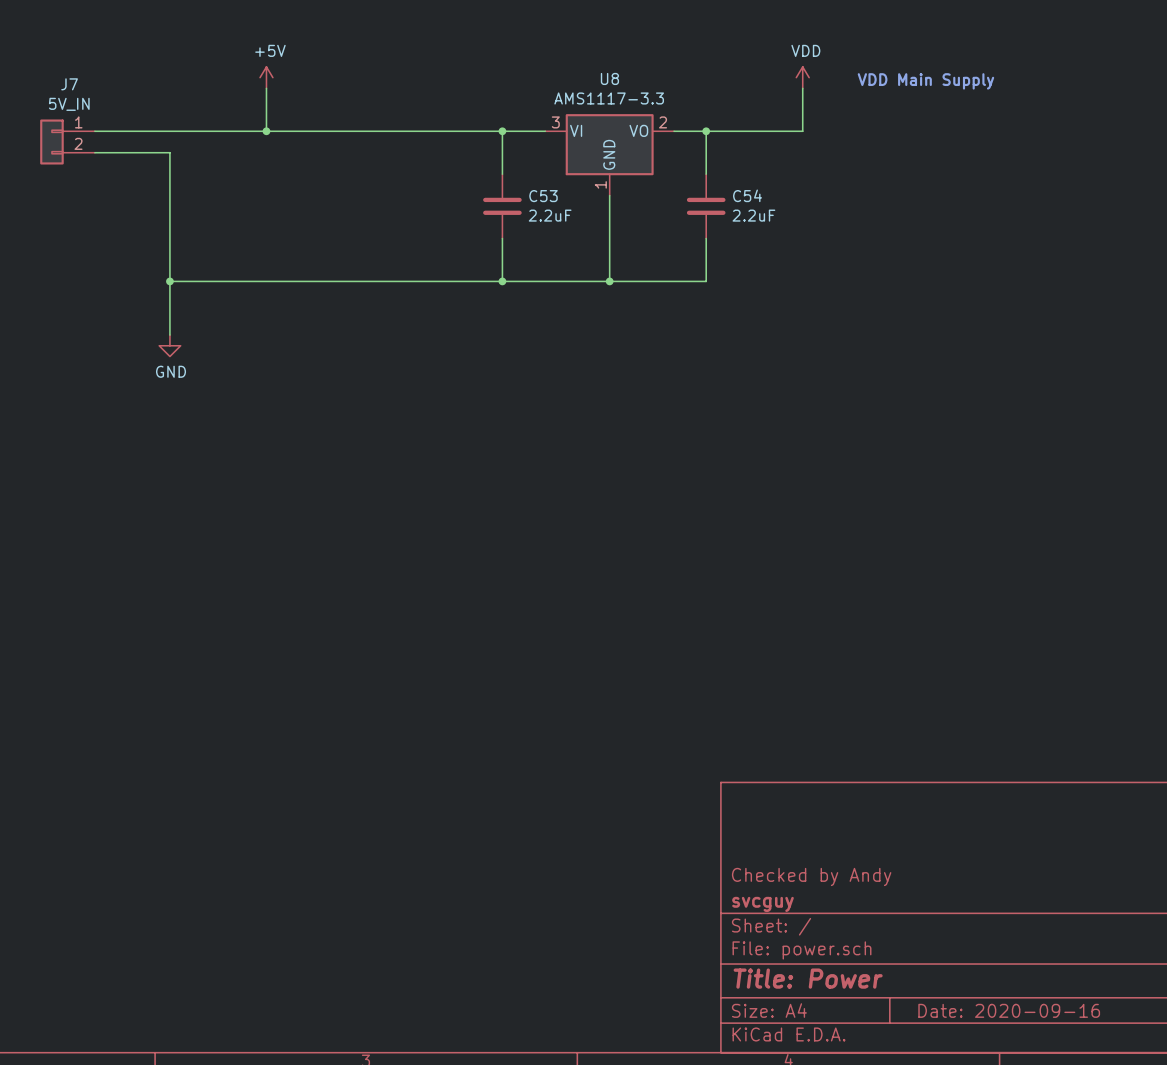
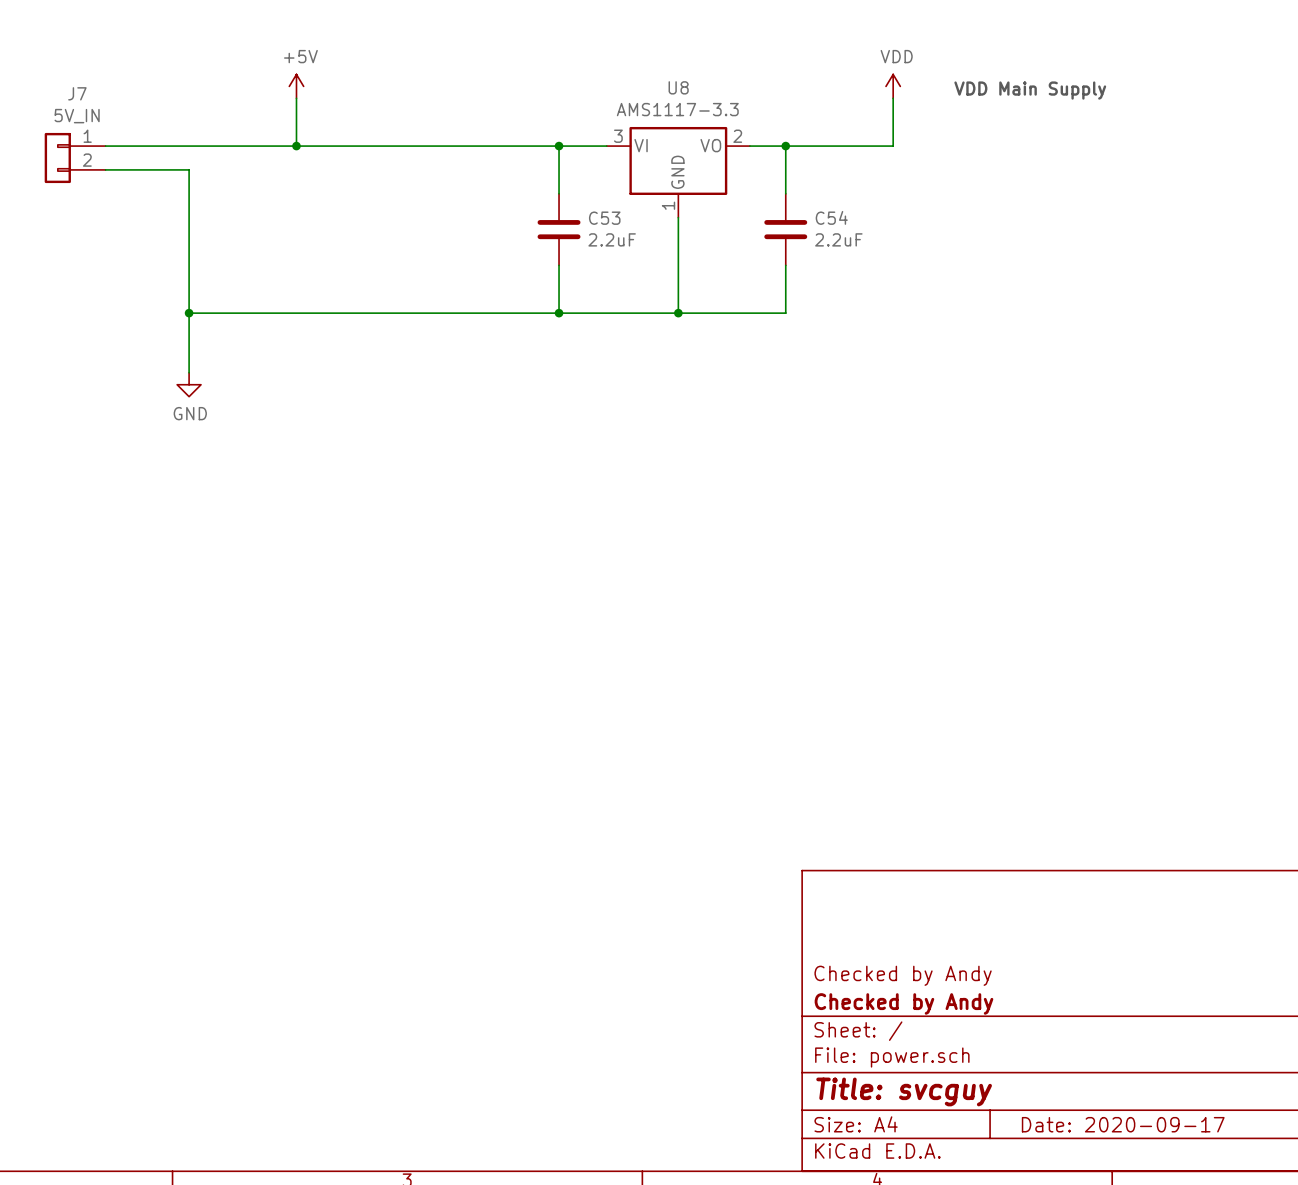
title block: svcguy (762, 904) -> Checked by Andy (903, 1003)
title block: Title: Power (808, 978) -> Title: svcguy (904, 1091)
title block: Date: 2020-09-16 (1009, 1010) -> Date: 2020-09-17 (1123, 1124)

